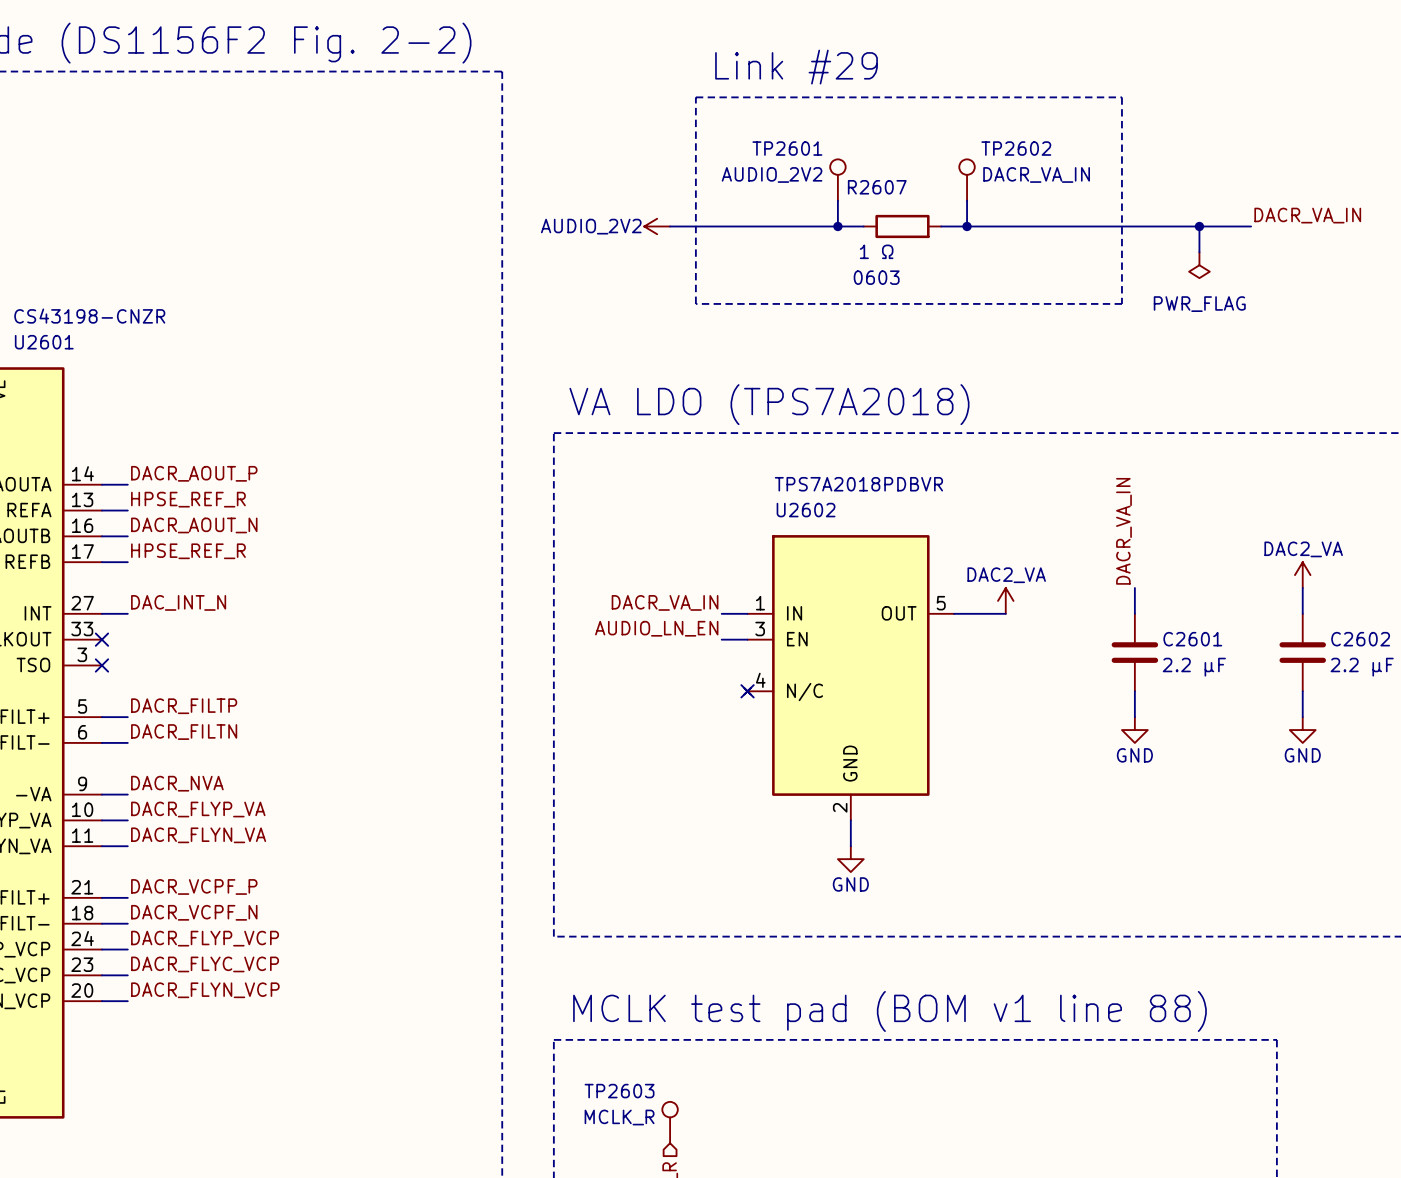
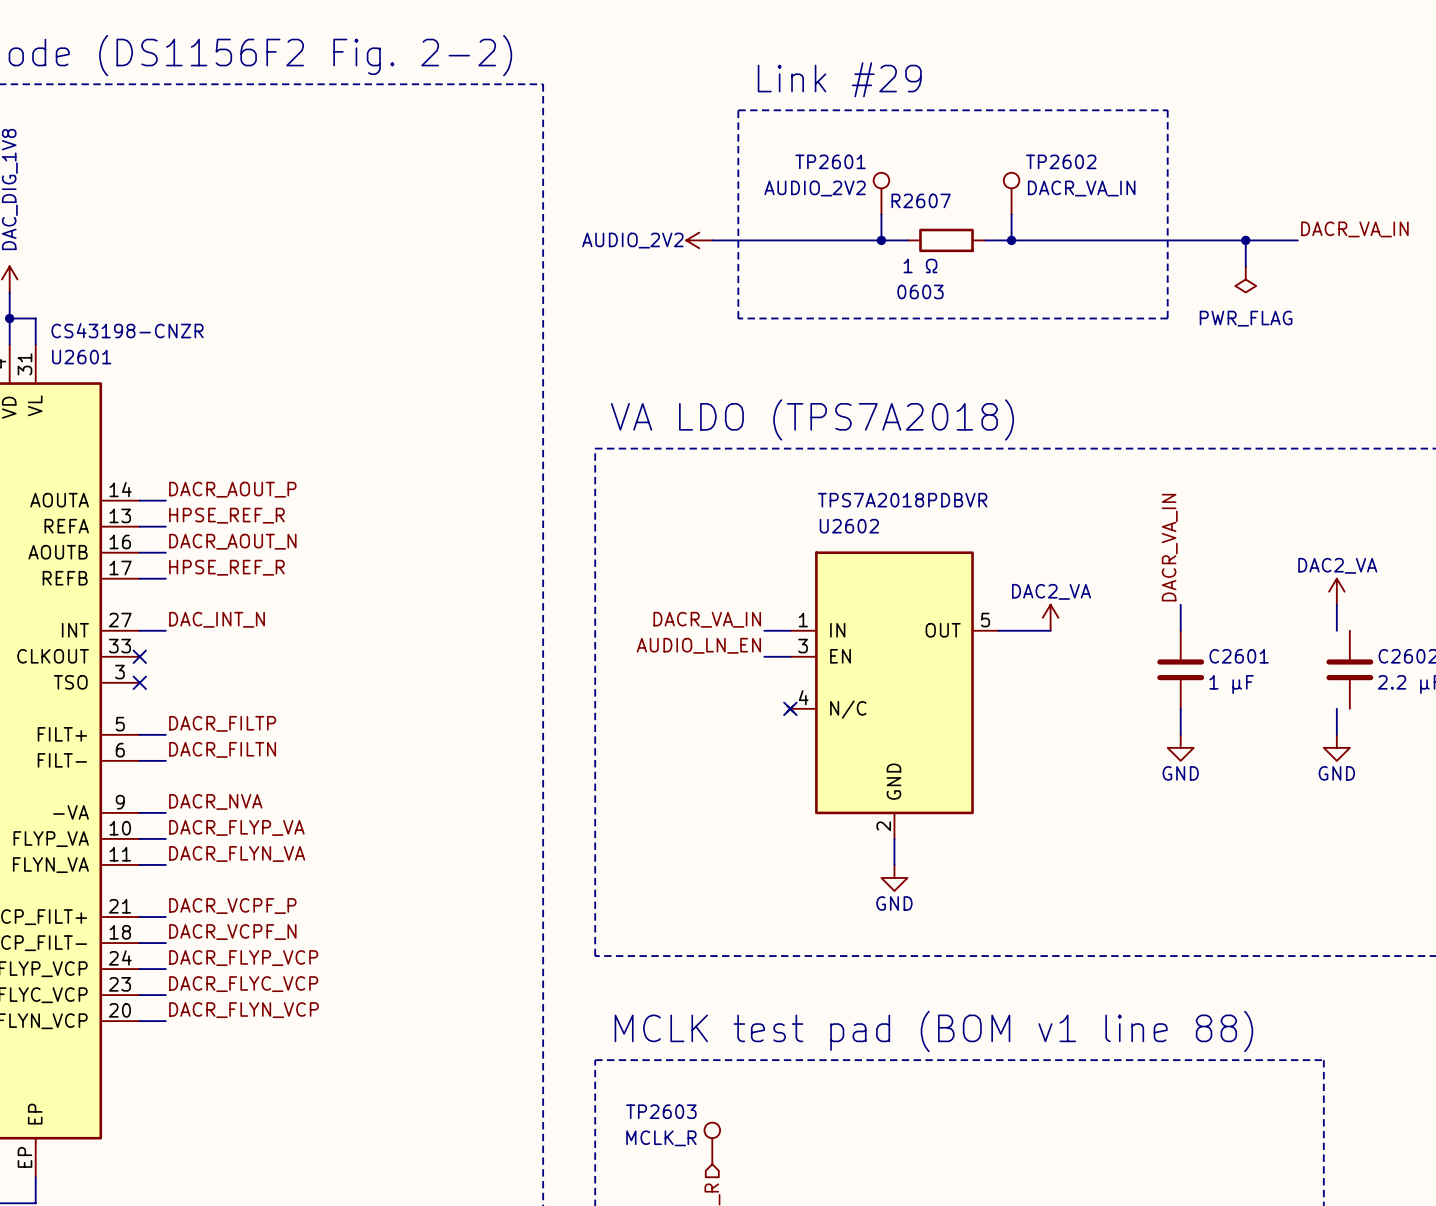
power symbol position: DAC2_VA (1302, 575) -> DAC2_VA (1336, 591)
wire: (1302, 588) (1302, 613) -> (1336, 604) (1336, 630)
C2601 value: 2.2 µF (1194, 667) -> 1 µF (1231, 684)
wire: (1302, 691) (1302, 717) -> (1336, 708) (1336, 734)
power symbol position: GND (1302, 730) -> GND (1336, 747)

